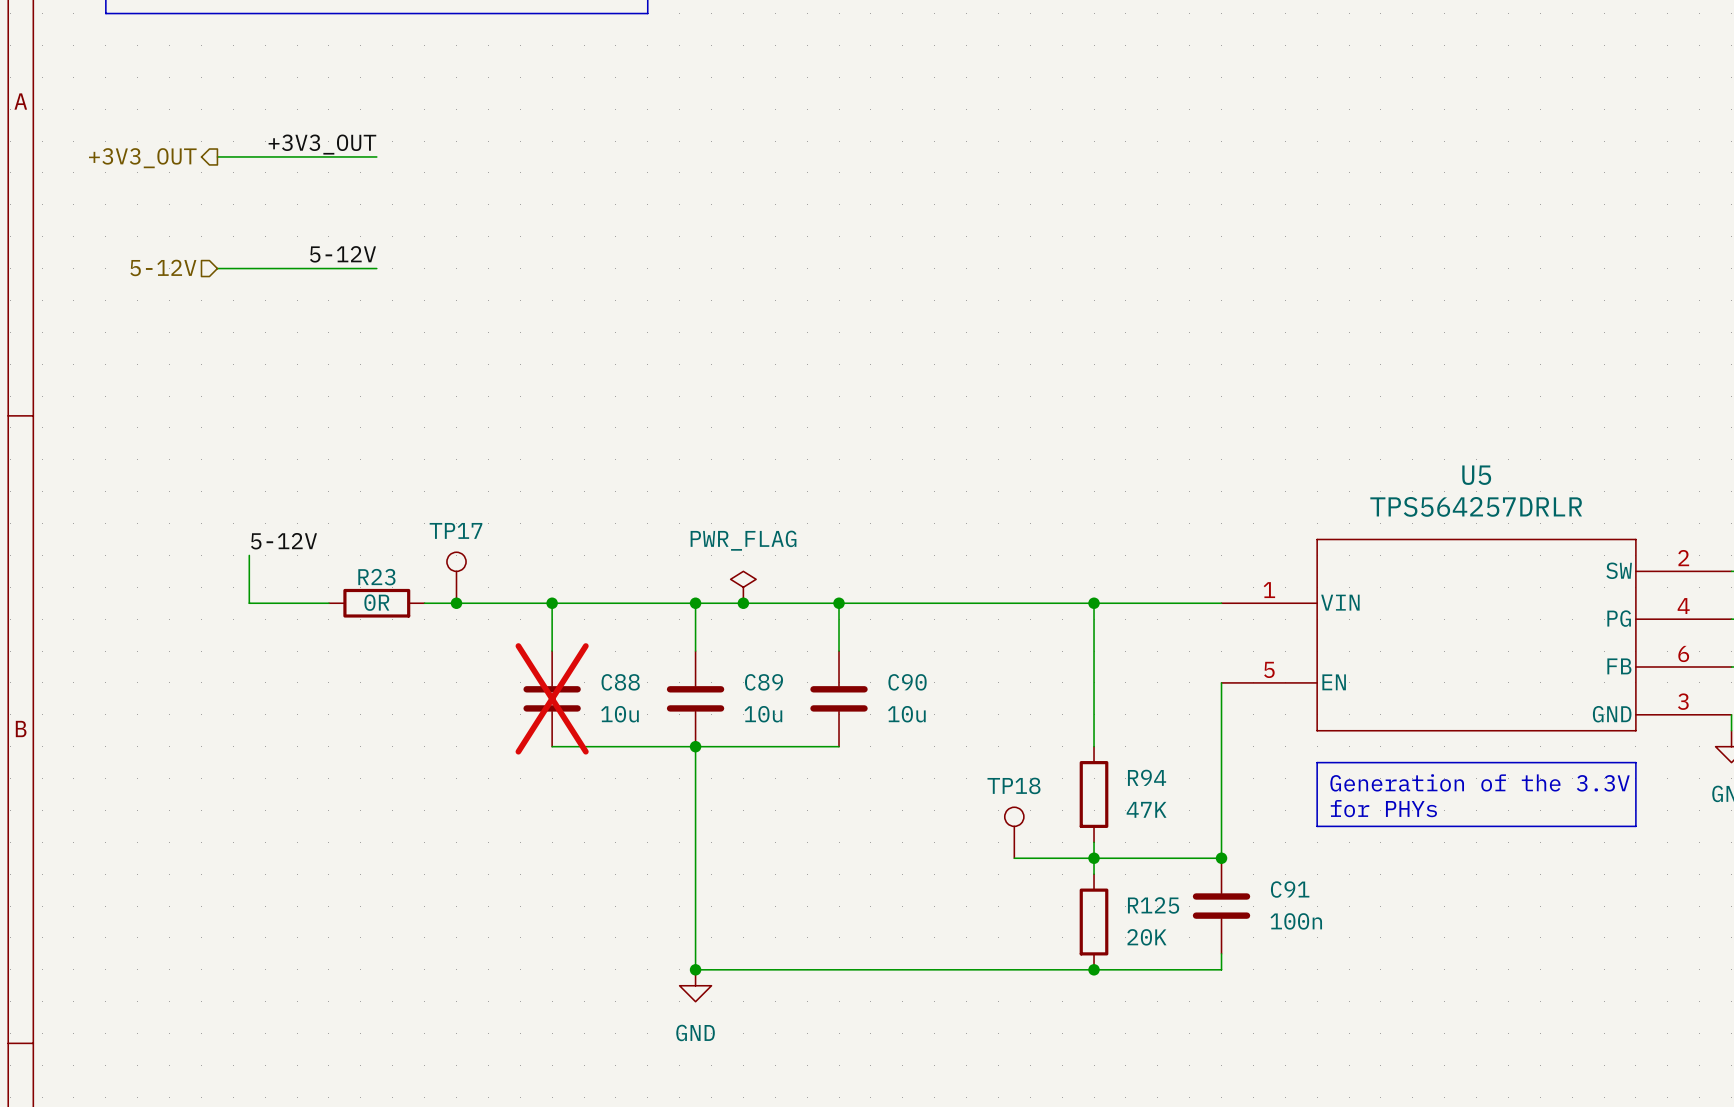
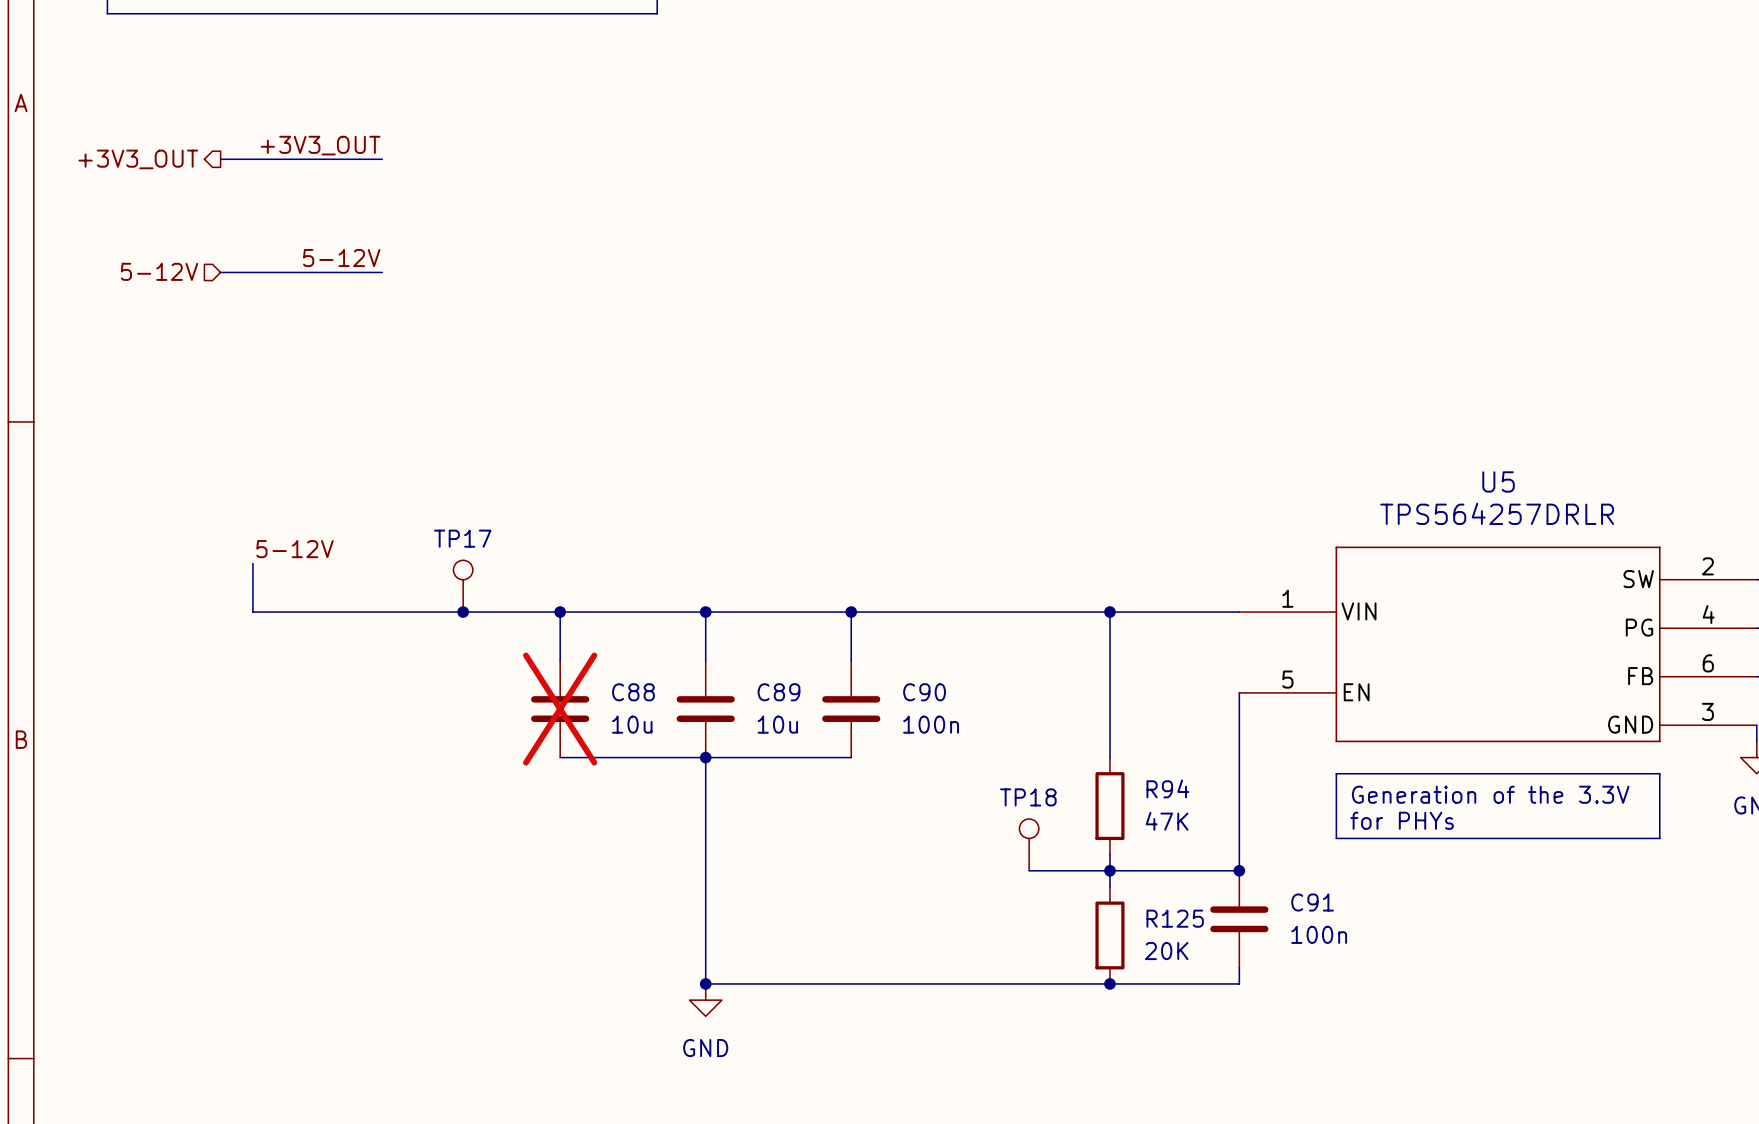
power symbol: PWR_FLAG (743, 587) -> none
wire: none -> (333, 612) (430, 612)
R23: 0R (376, 603) -> none
junction: (743, 603) -> none
C90 value: 10u (906, 714) -> 100n (931, 724)

